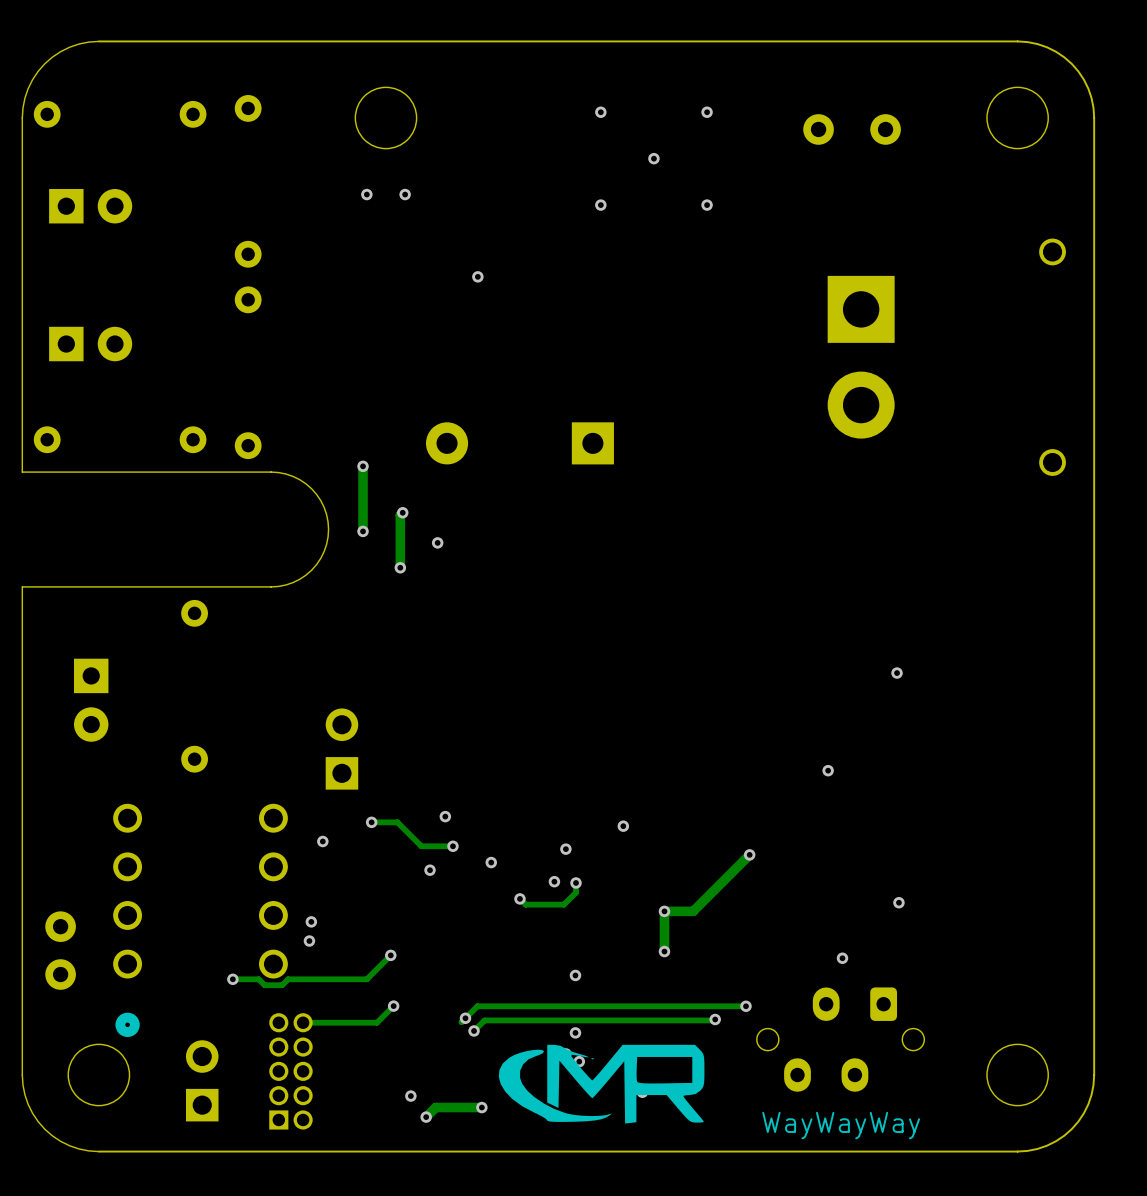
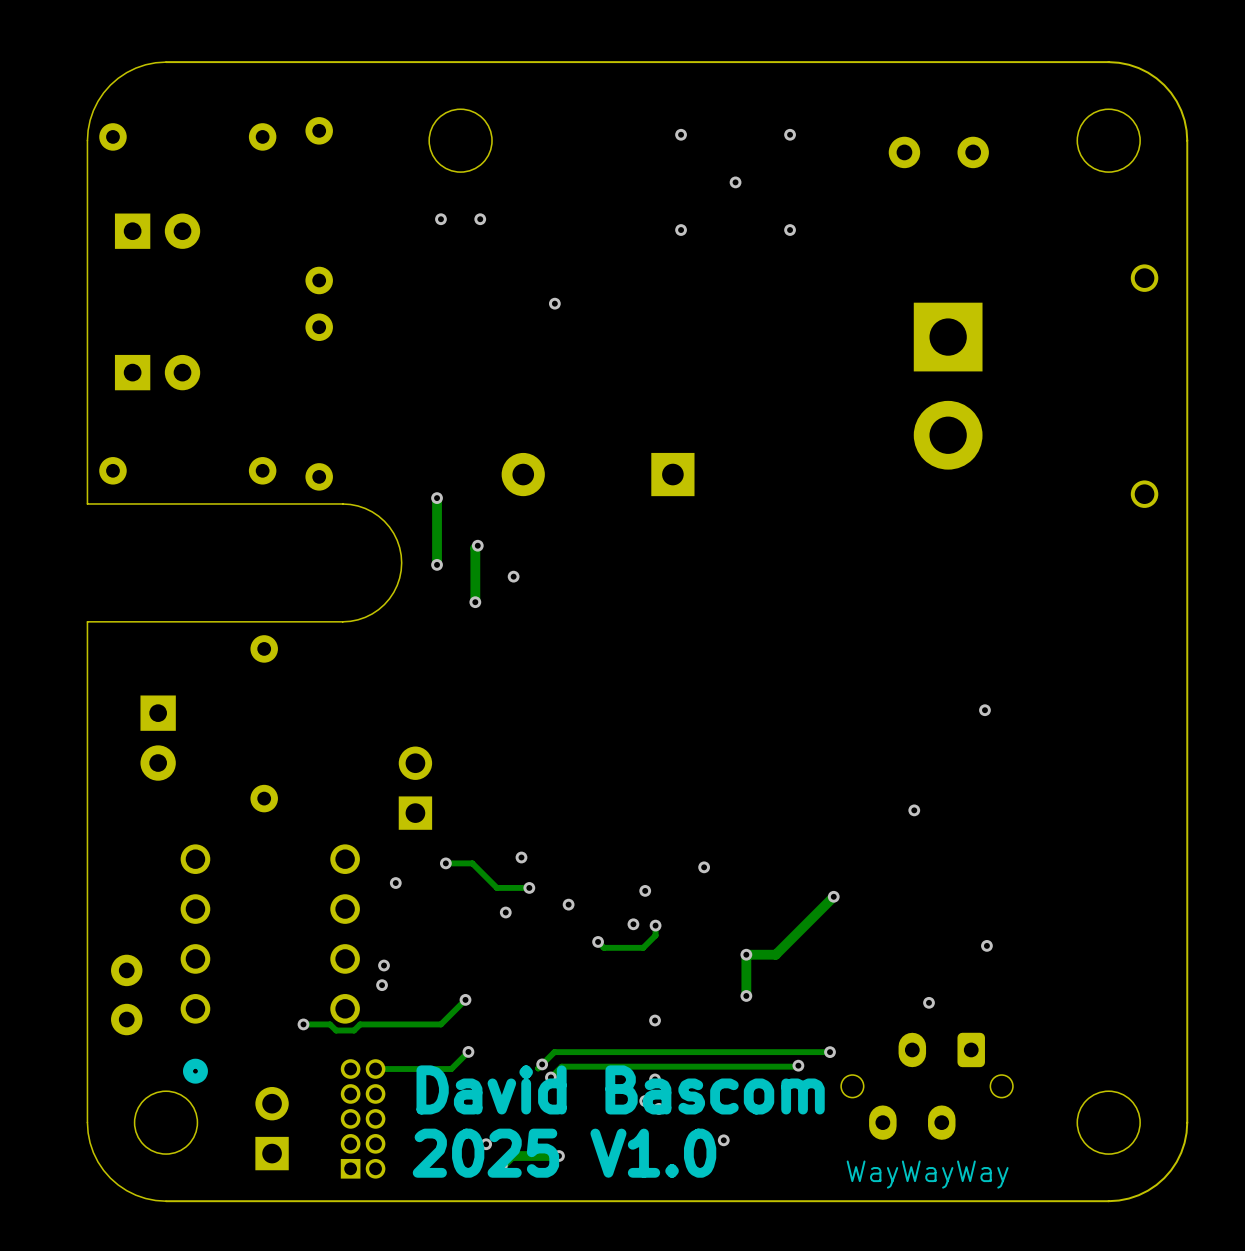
text: none -> David Bascom (620, 1089)
drawing: [498, 1044, 705, 1124] -> none
text: none -> 2025 V1.0 (564, 1153)

